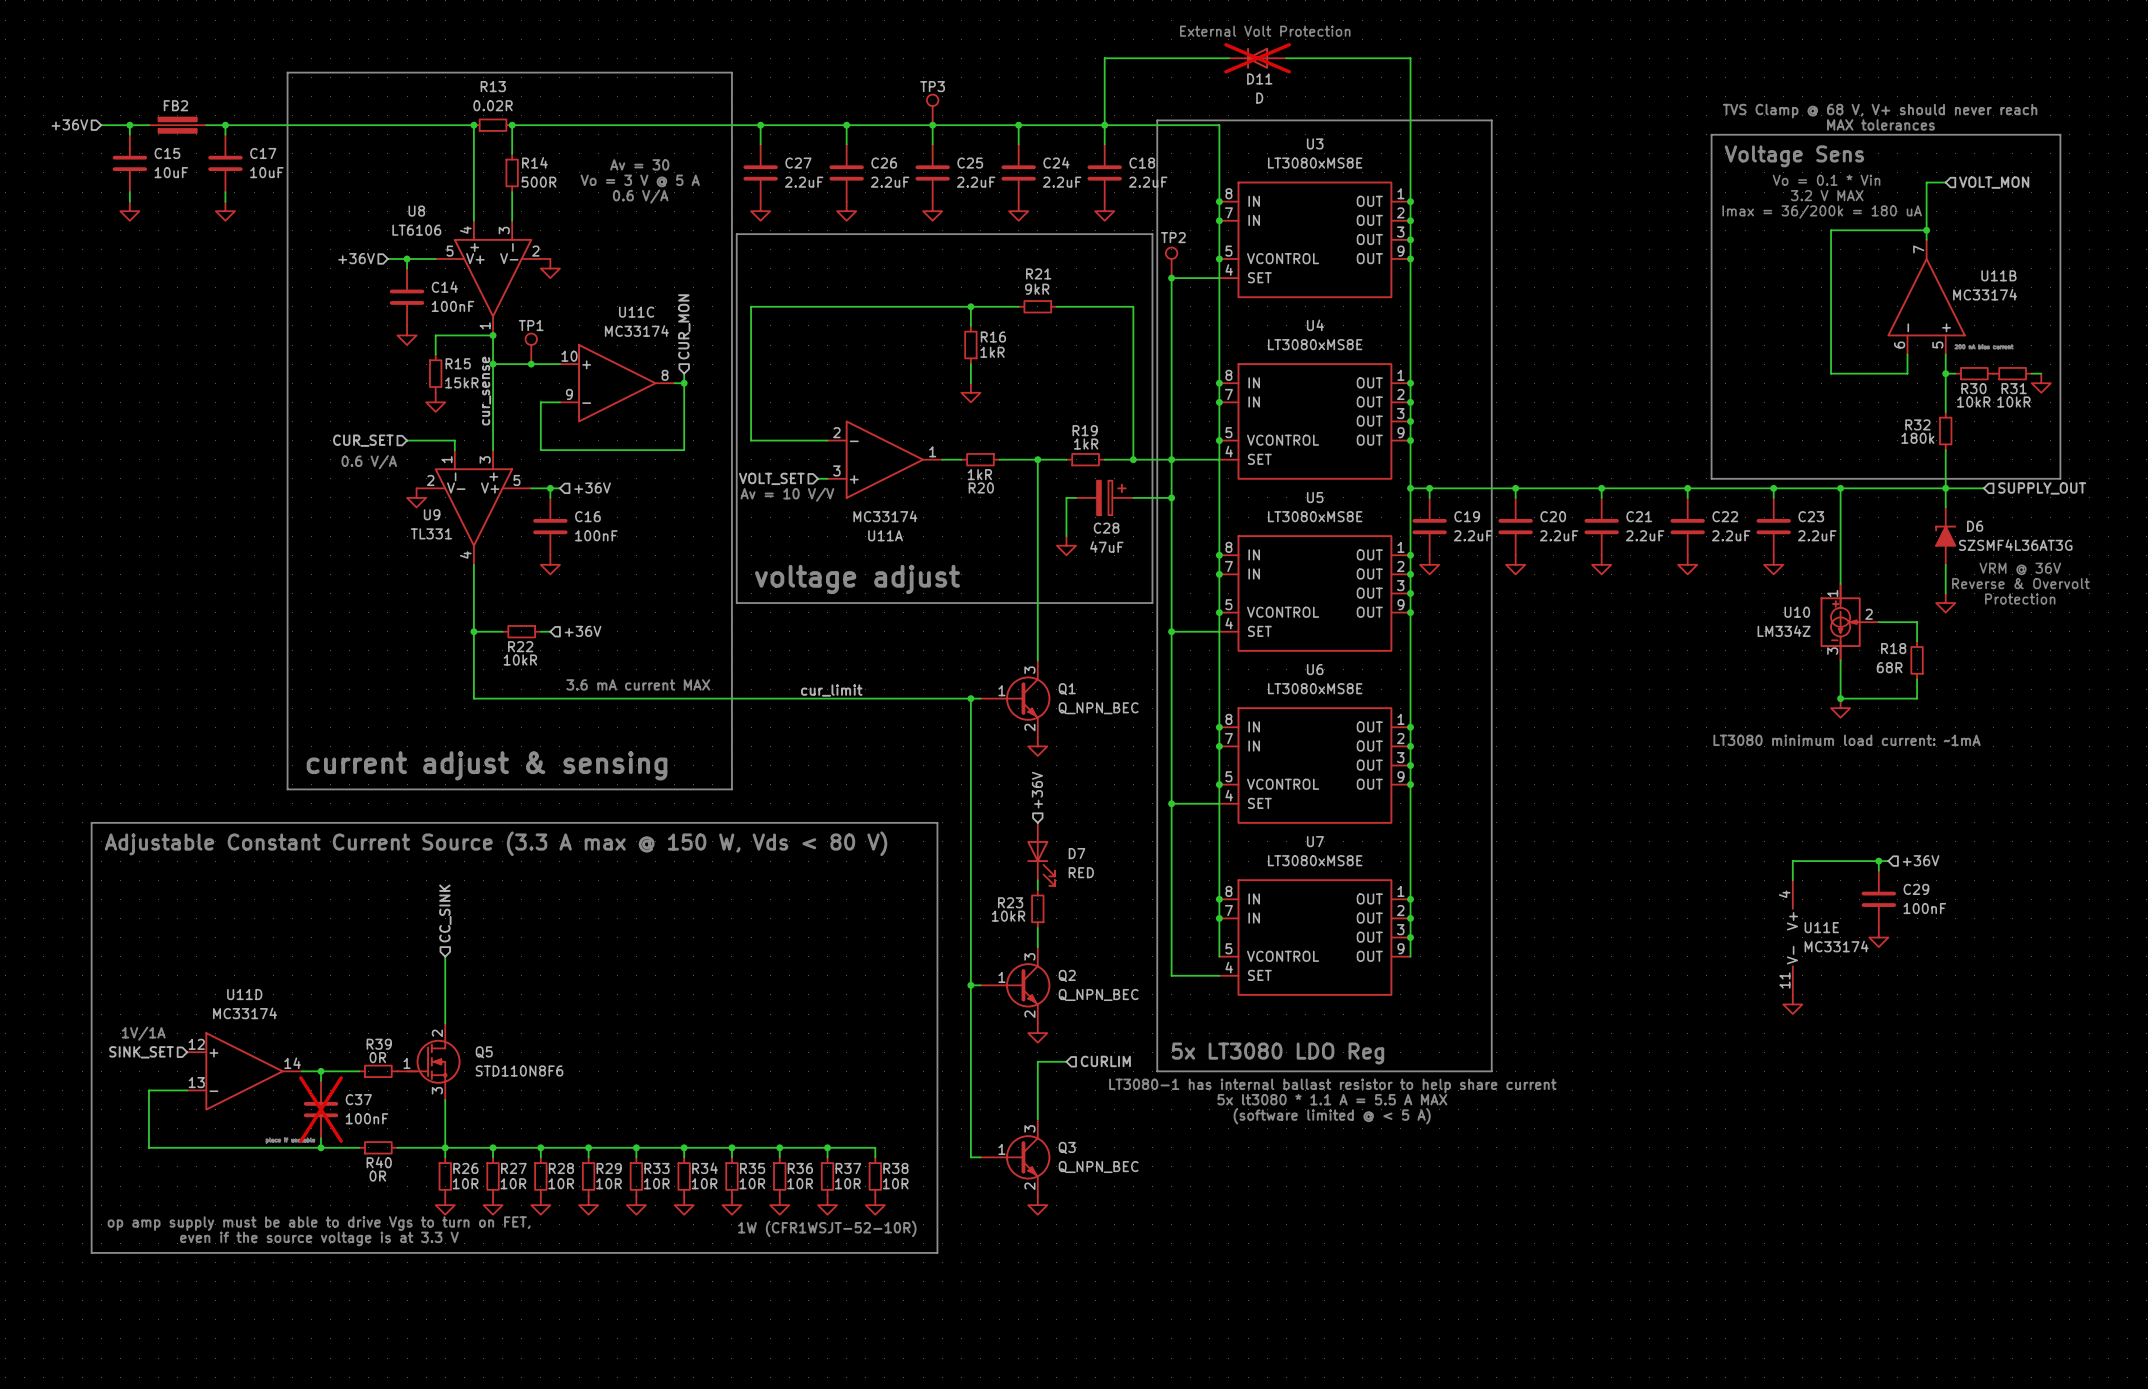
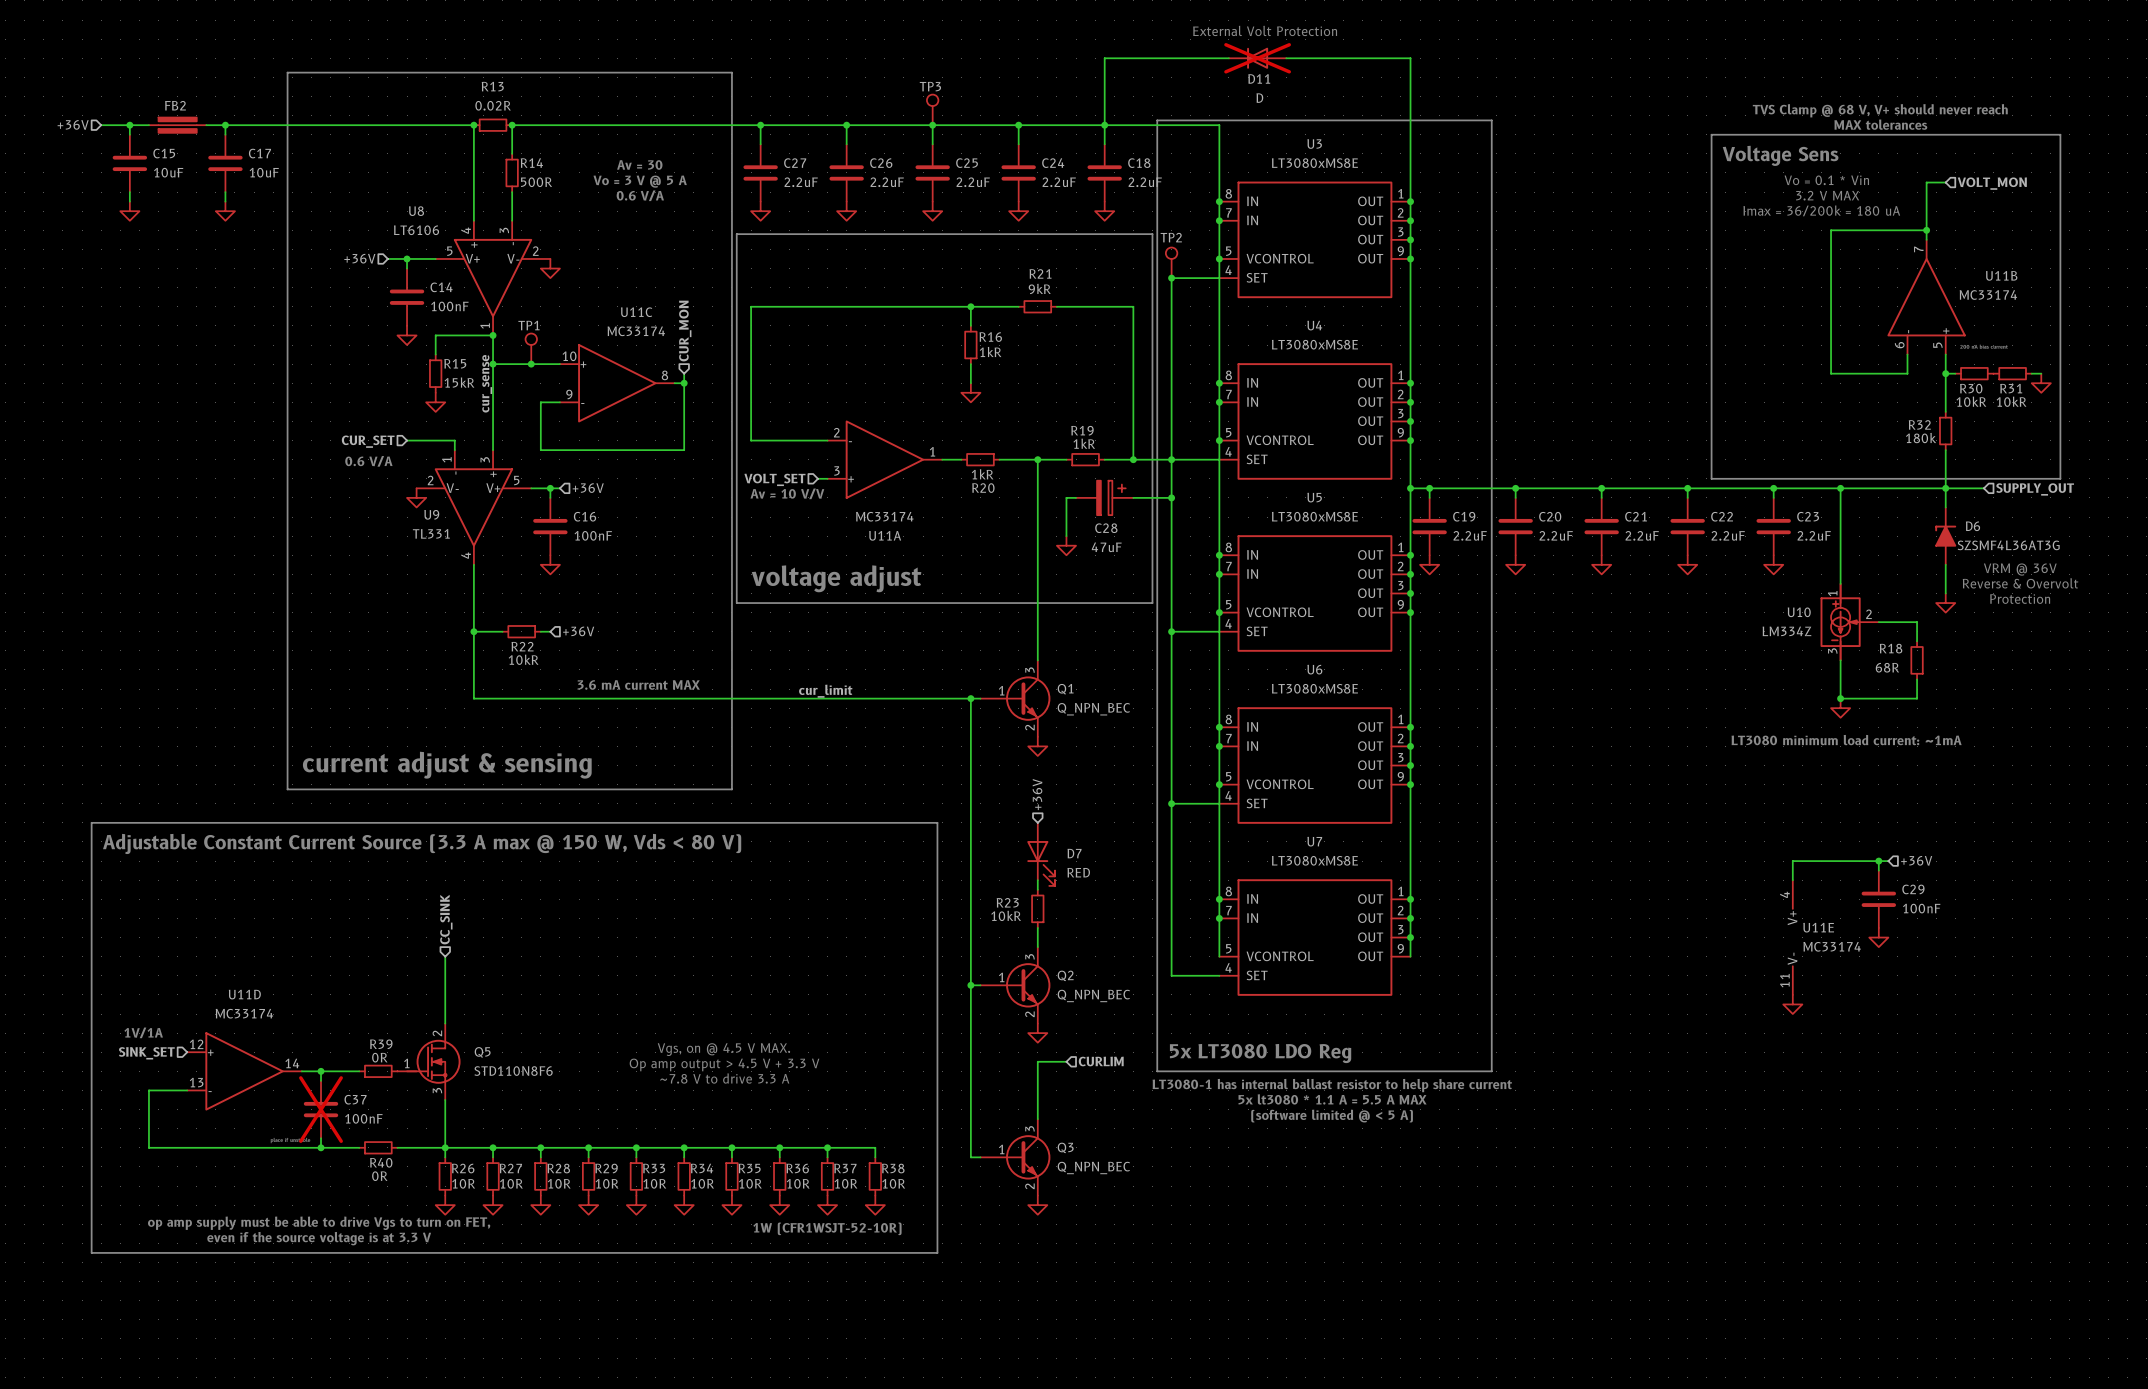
text: none -> Vgs, on @ 4.5 V MAX. (723, 1049)
text: none -> Op amp output > 4.5 V + 3.3 V (724, 1064)
text: none -> ~7.8 V to drive 3.3 A (724, 1078)

